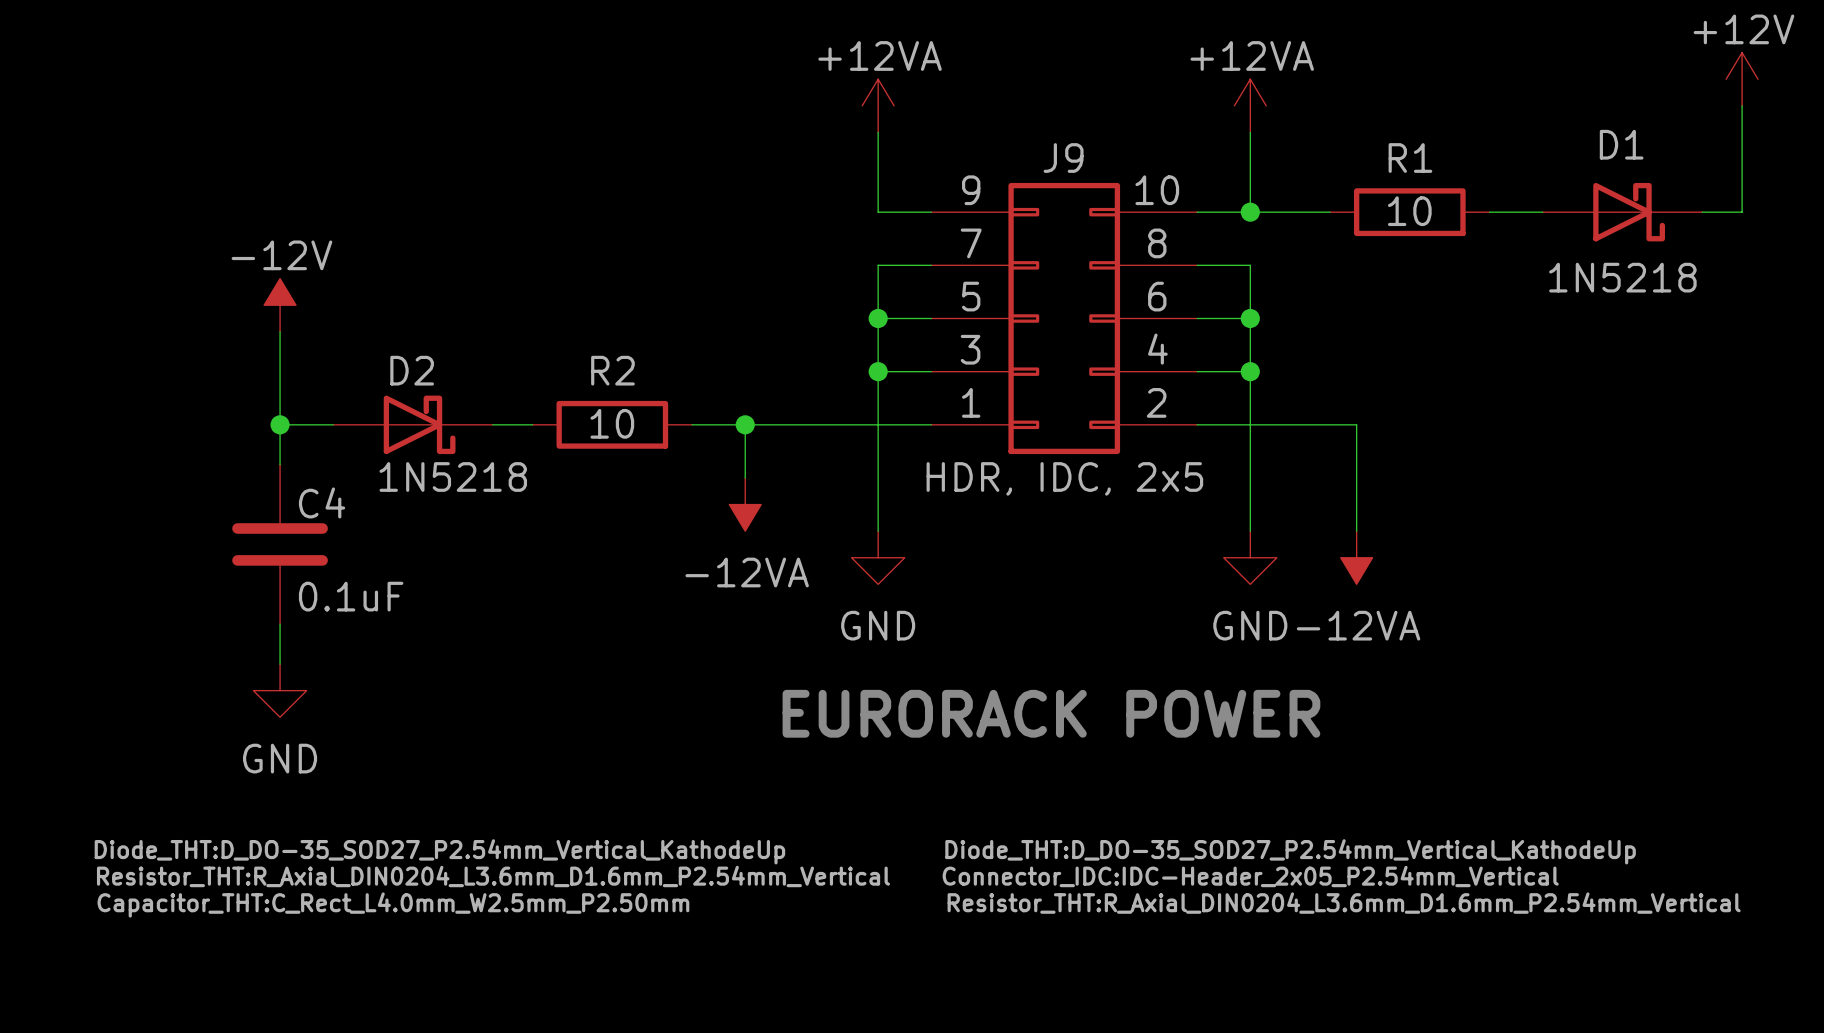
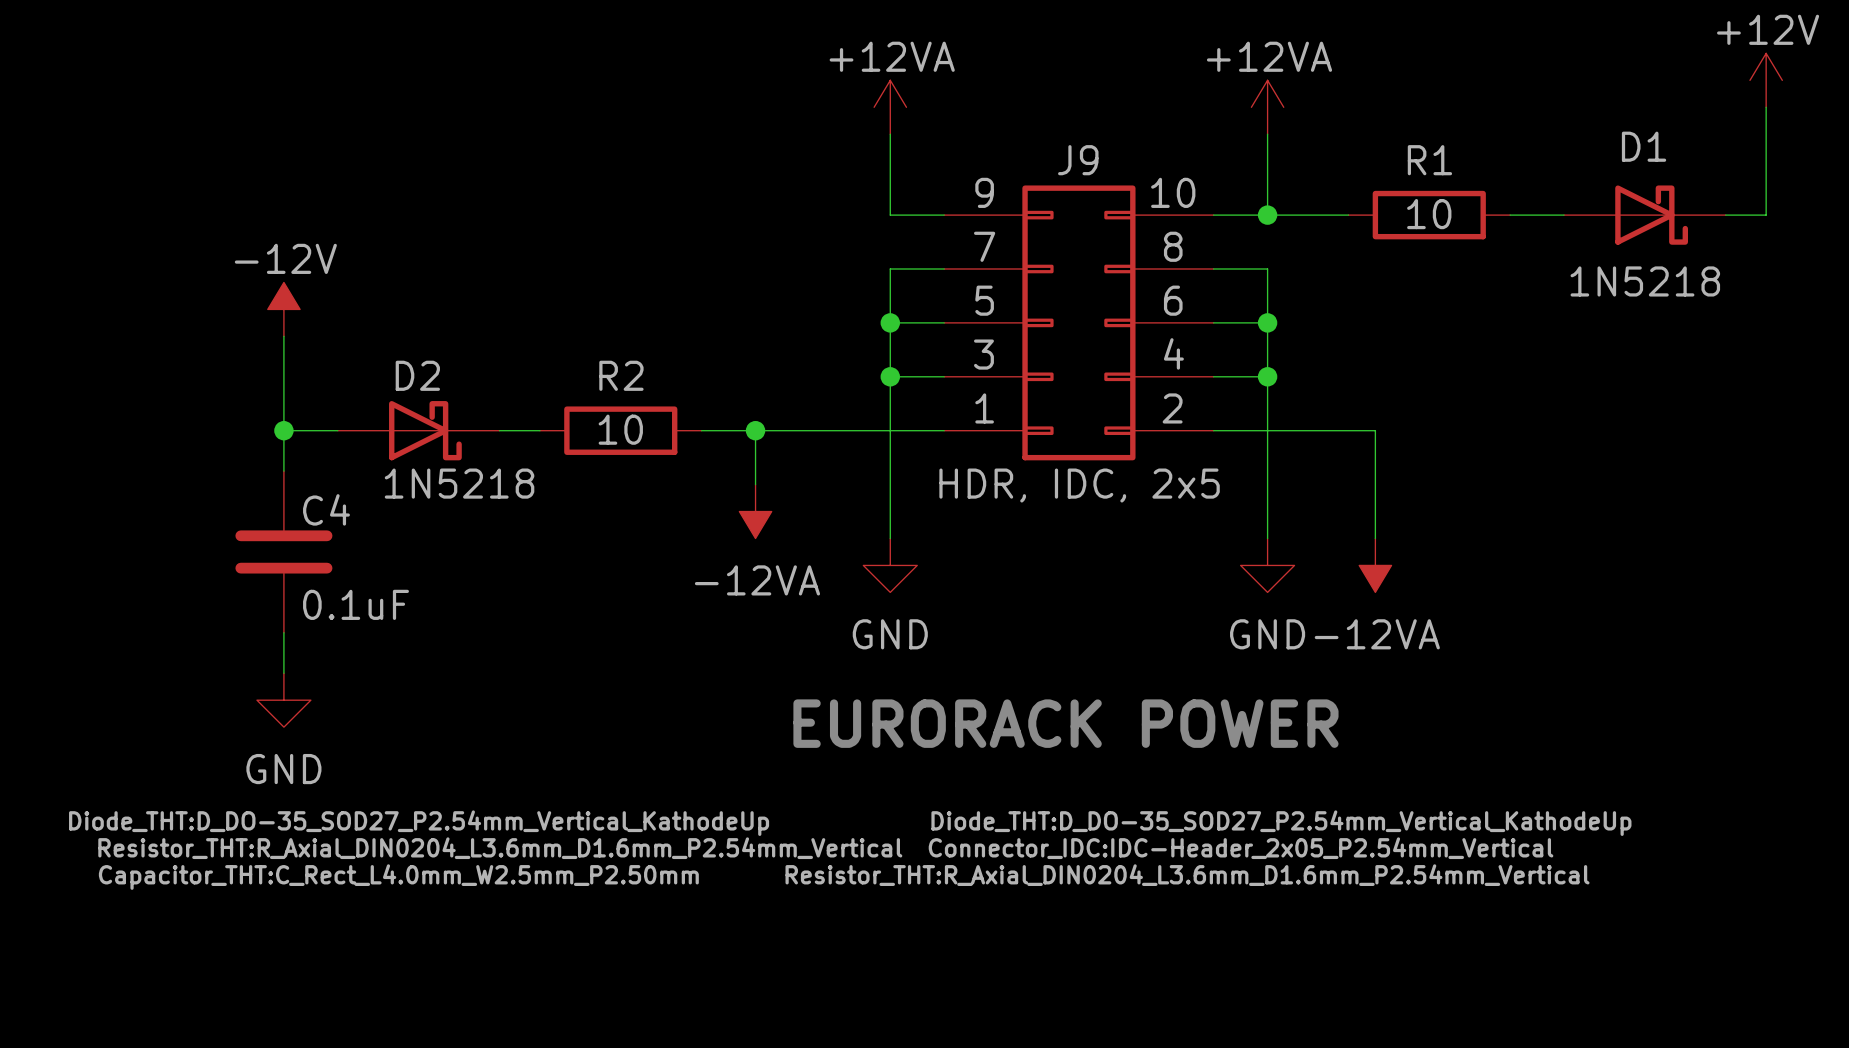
D2 text position: Diode_THT:D_DO-35_SOD27_P2.54mm_Vertical_KathodeUp (439, 851) -> Diode_THT:D_DO-35_SOD27_P2.54mm_Vertical_KathodeUp (419, 823)
D1 text position: Diode_THT:D_DO-35_SOD27_P2.54mm_Vertical_KathodeUp (1290, 851) -> Diode_THT:D_DO-35_SOD27_P2.54mm_Vertical_KathodeUp (1281, 823)
R2 text position: Resistor_THT:R_Axial_DIN0204_L3.6mm_D1.6mm_P2.54mm_Vertical (493, 876) -> Resistor_THT:R_Axial_DIN0204_L3.6mm_D1.6mm_P2.54mm_Vertical (500, 848)
J9 text position: Connector_IDC:IDC-Header_2x05_P2.54mm_Vertical (1250, 876) -> Connector_IDC:IDC-Header_2x05_P2.54mm_Vertical (1241, 848)
R1 text position: Resistor_THT:R_Axial_DIN0204_L3.6mm_D1.6mm_P2.54mm_Vertical (1344, 903) -> Resistor_THT:R_Axial_DIN0204_L3.6mm_D1.6mm_P2.54mm_Vertical (1187, 875)
C4 text position: Capacitor_THT:C_Rect_L4.0mm_W2.5mm_P2.50mm (393, 904) -> Capacitor_THT:C_Rect_L4.0mm_W2.5mm_P2.50mm (398, 877)

